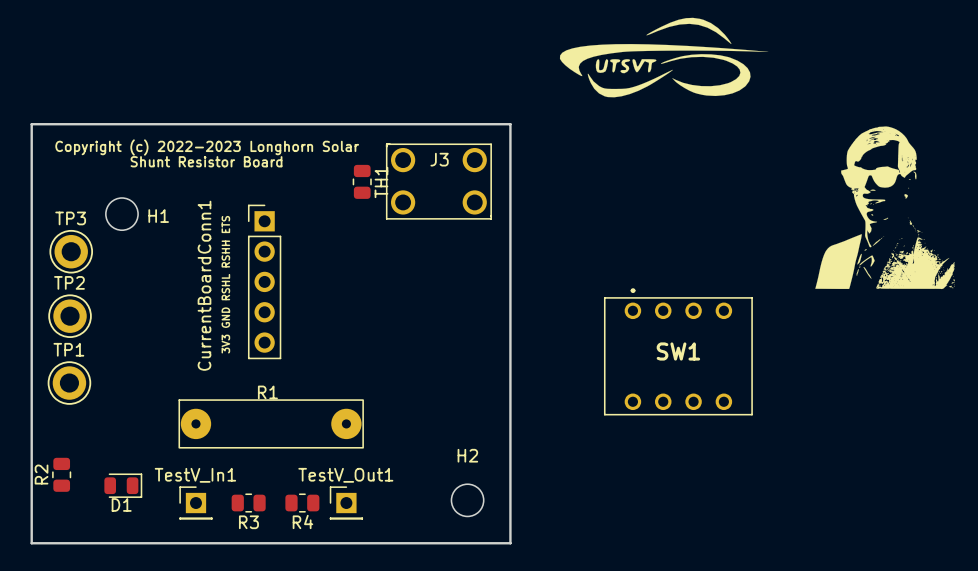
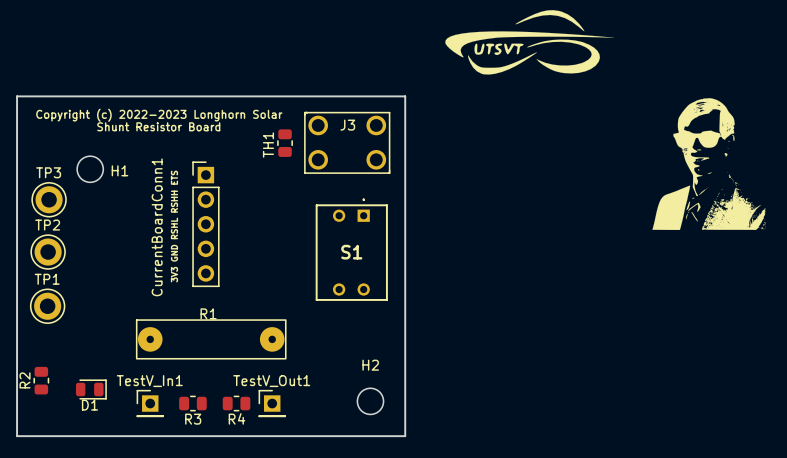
TH1 name position: TH1 (381, 182) -> TH1 (268, 145)
S1: none -> (351, 249)
SW1: (678, 351) -> none

